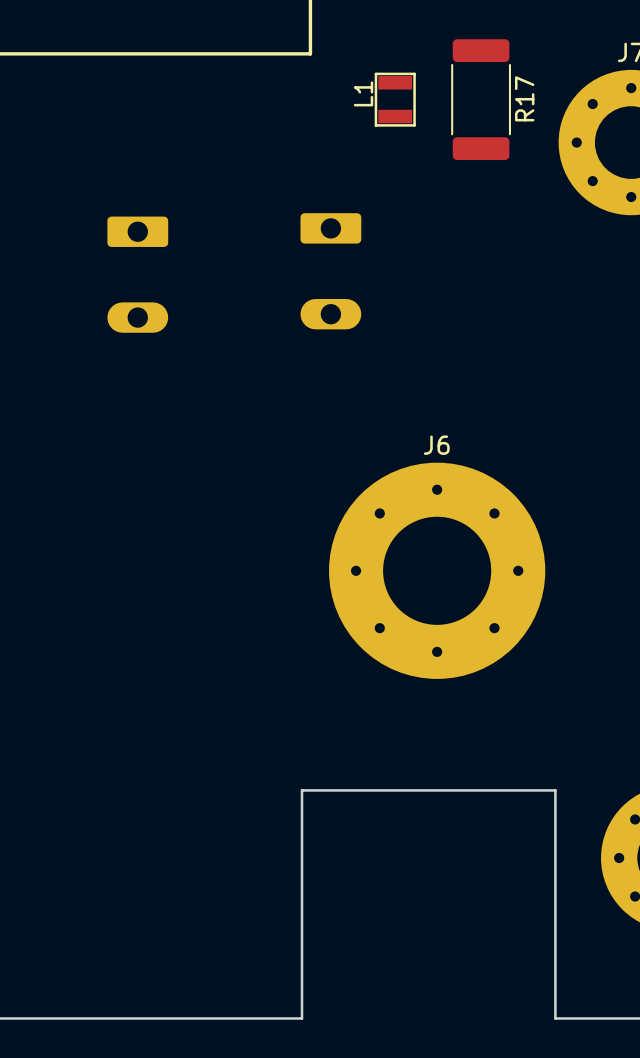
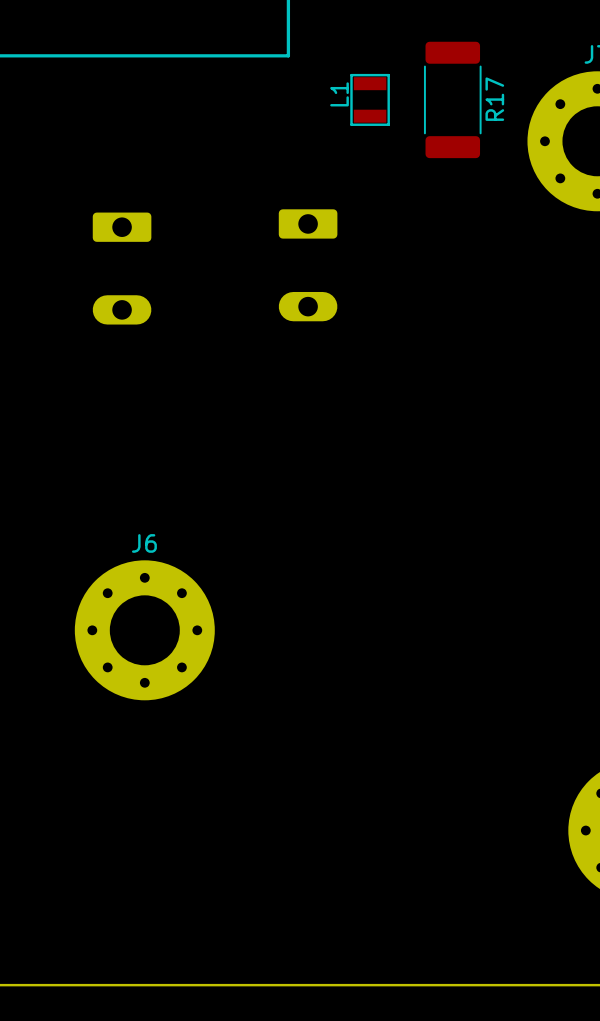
J6 name position: J6 (436, 445) -> J6 (144, 543)
J6 footprint: [329, 462, 546, 679] -> [74, 560, 215, 701]
board edge: (302, 1018) (302, 790) (555, 790) (555, 1018) -> (280, 985) (524, 985)

